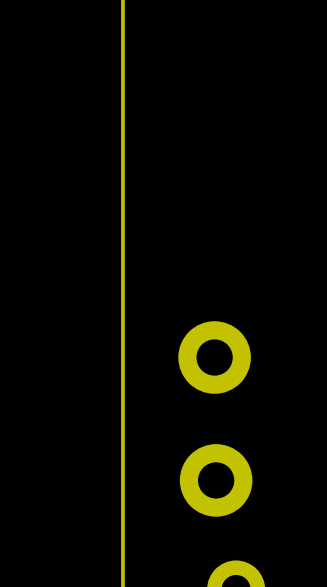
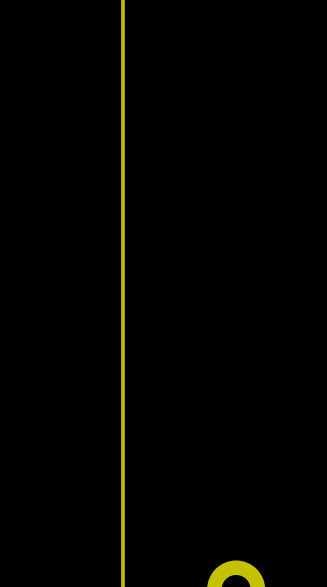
part: (214, 357) -> none
part: (216, 480) -> none

